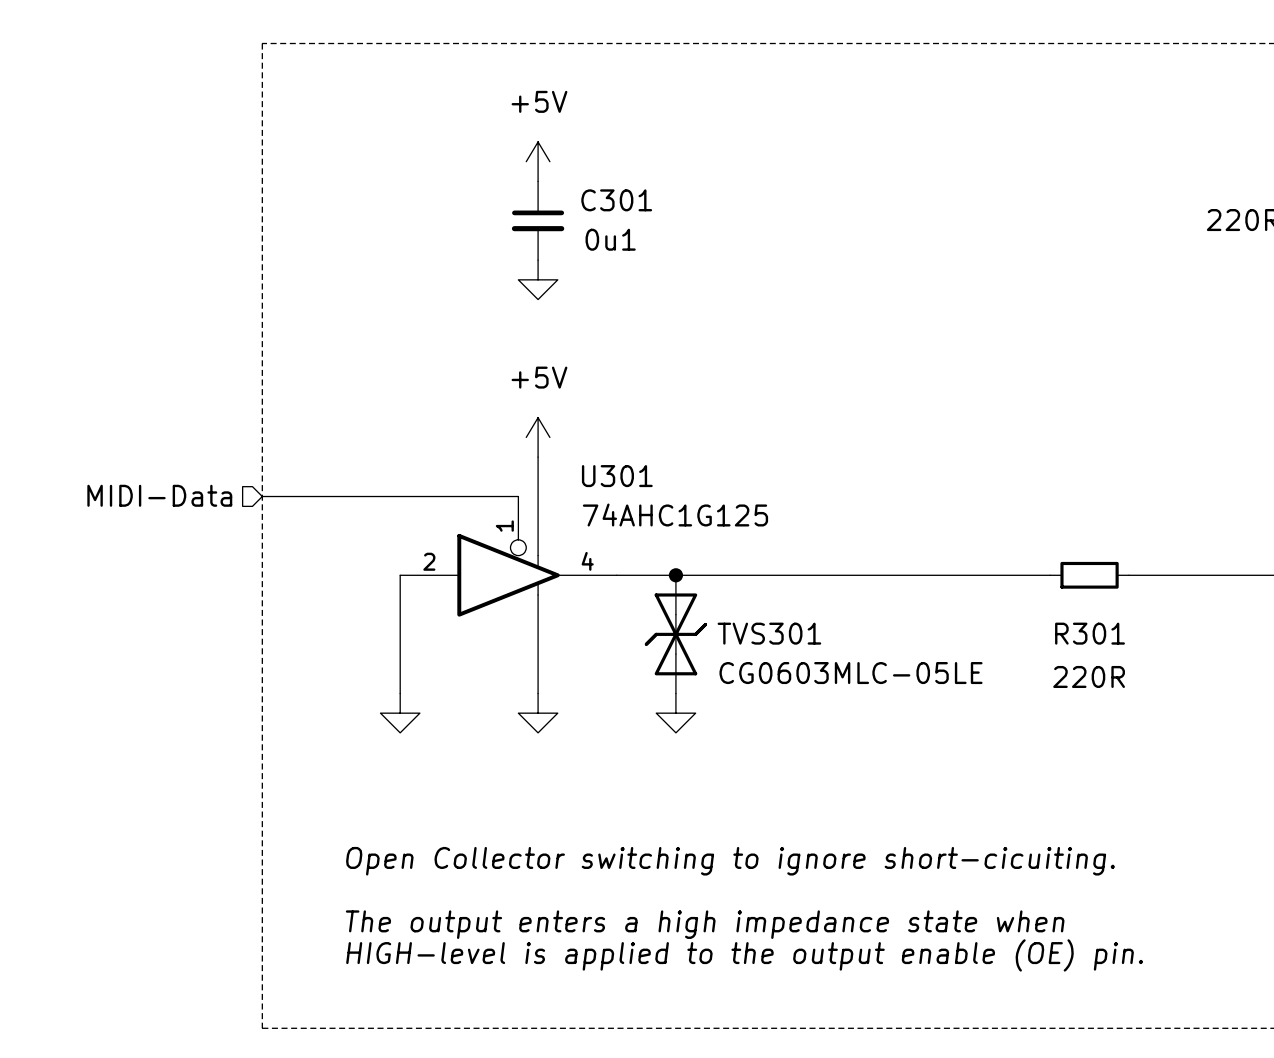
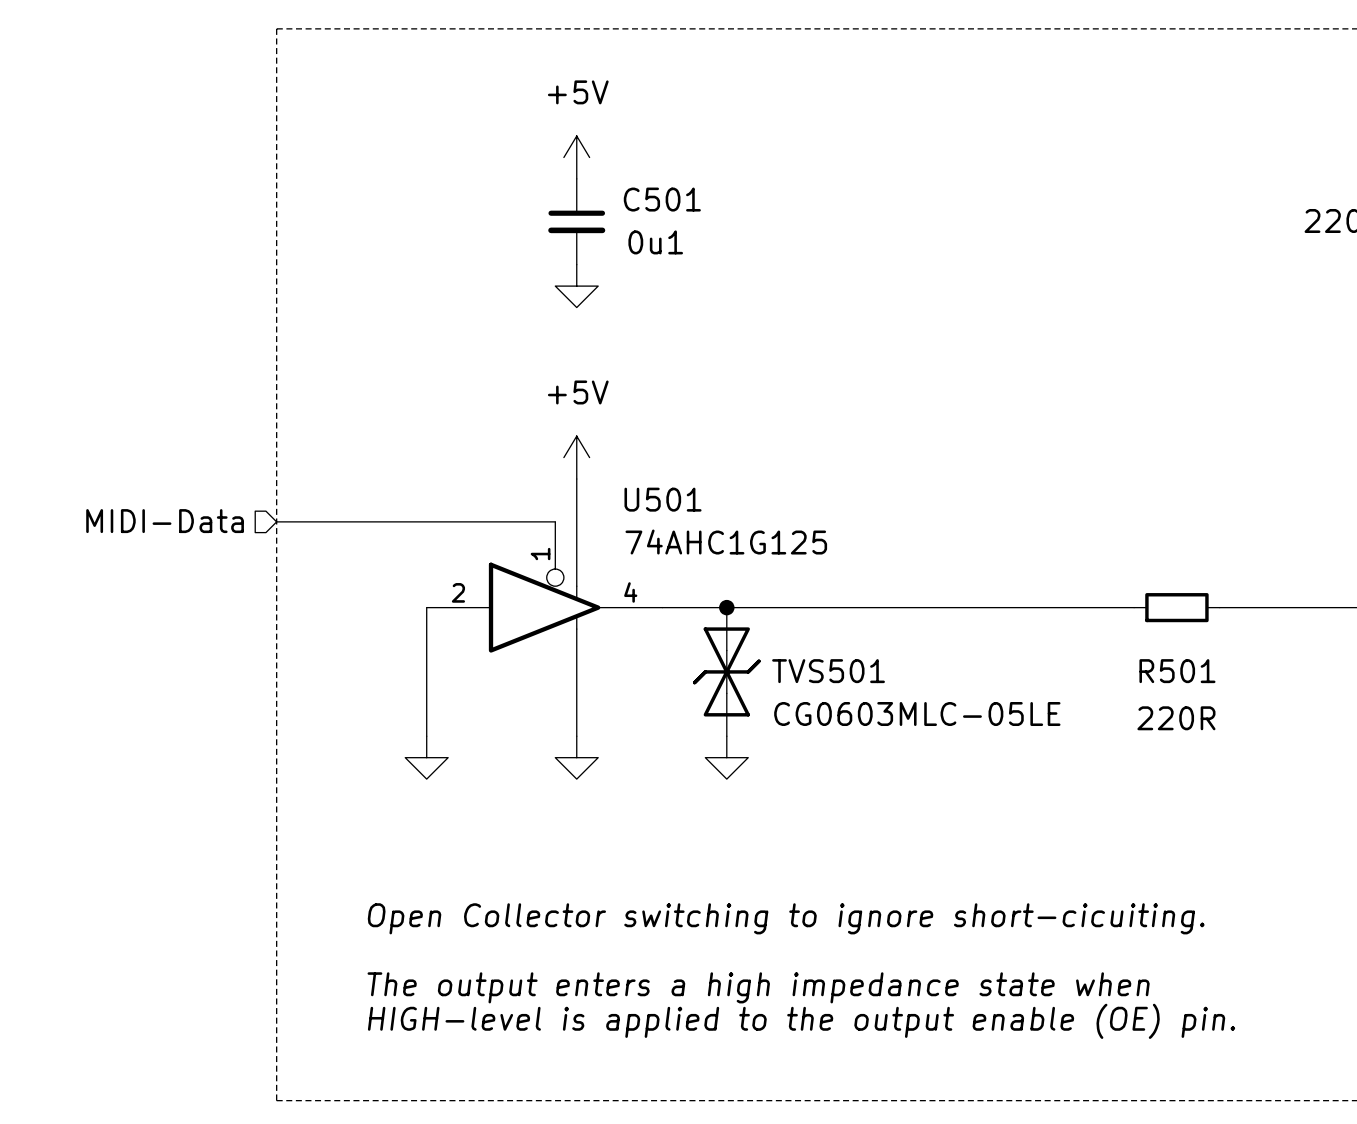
C301 name: C301 (616, 200) -> C501 (662, 199)
U301 name: U301 (617, 476) -> U501 (663, 499)
TVS301 name: TVS301 (769, 633) -> TVS501 (828, 671)
R301 name: R301 (1090, 633) -> R501 (1177, 671)

